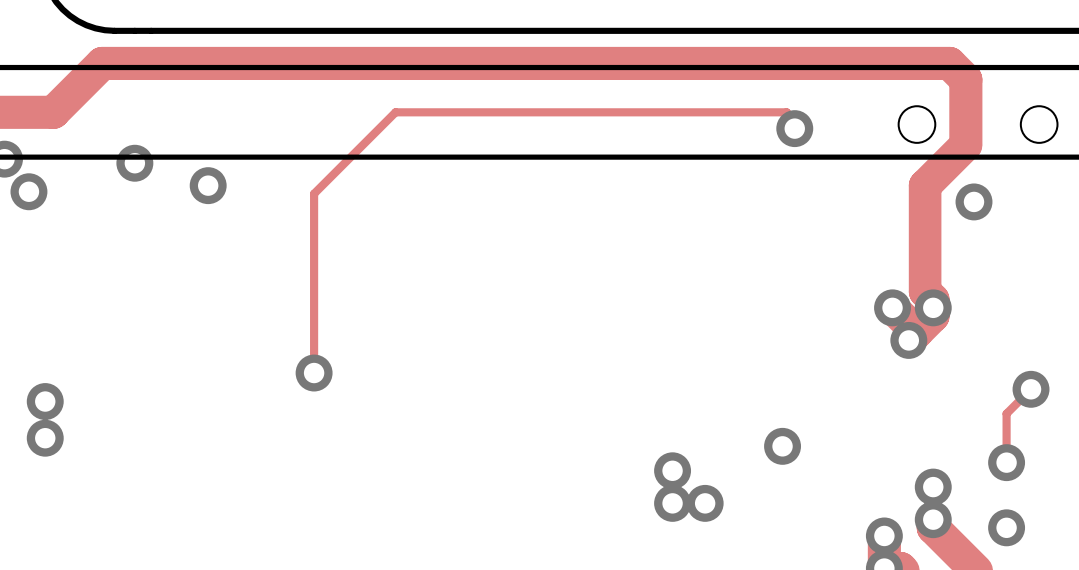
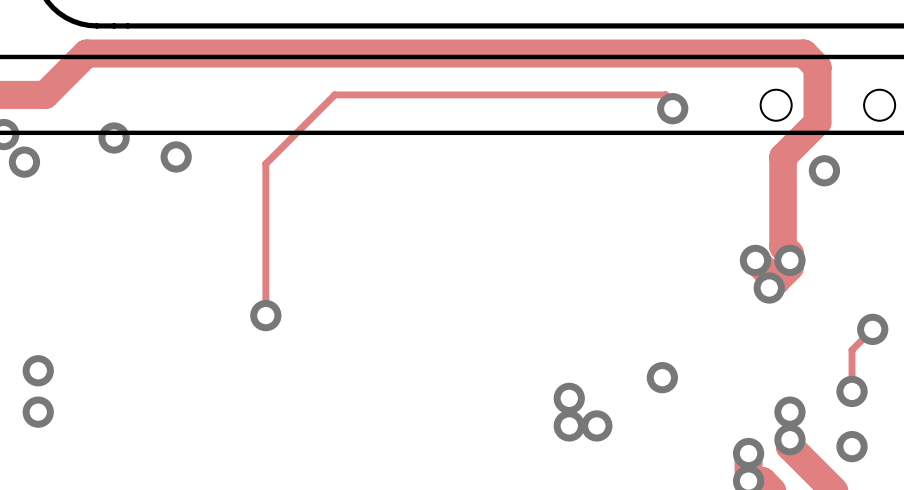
via position: (45, 401) -> (38, 412)

